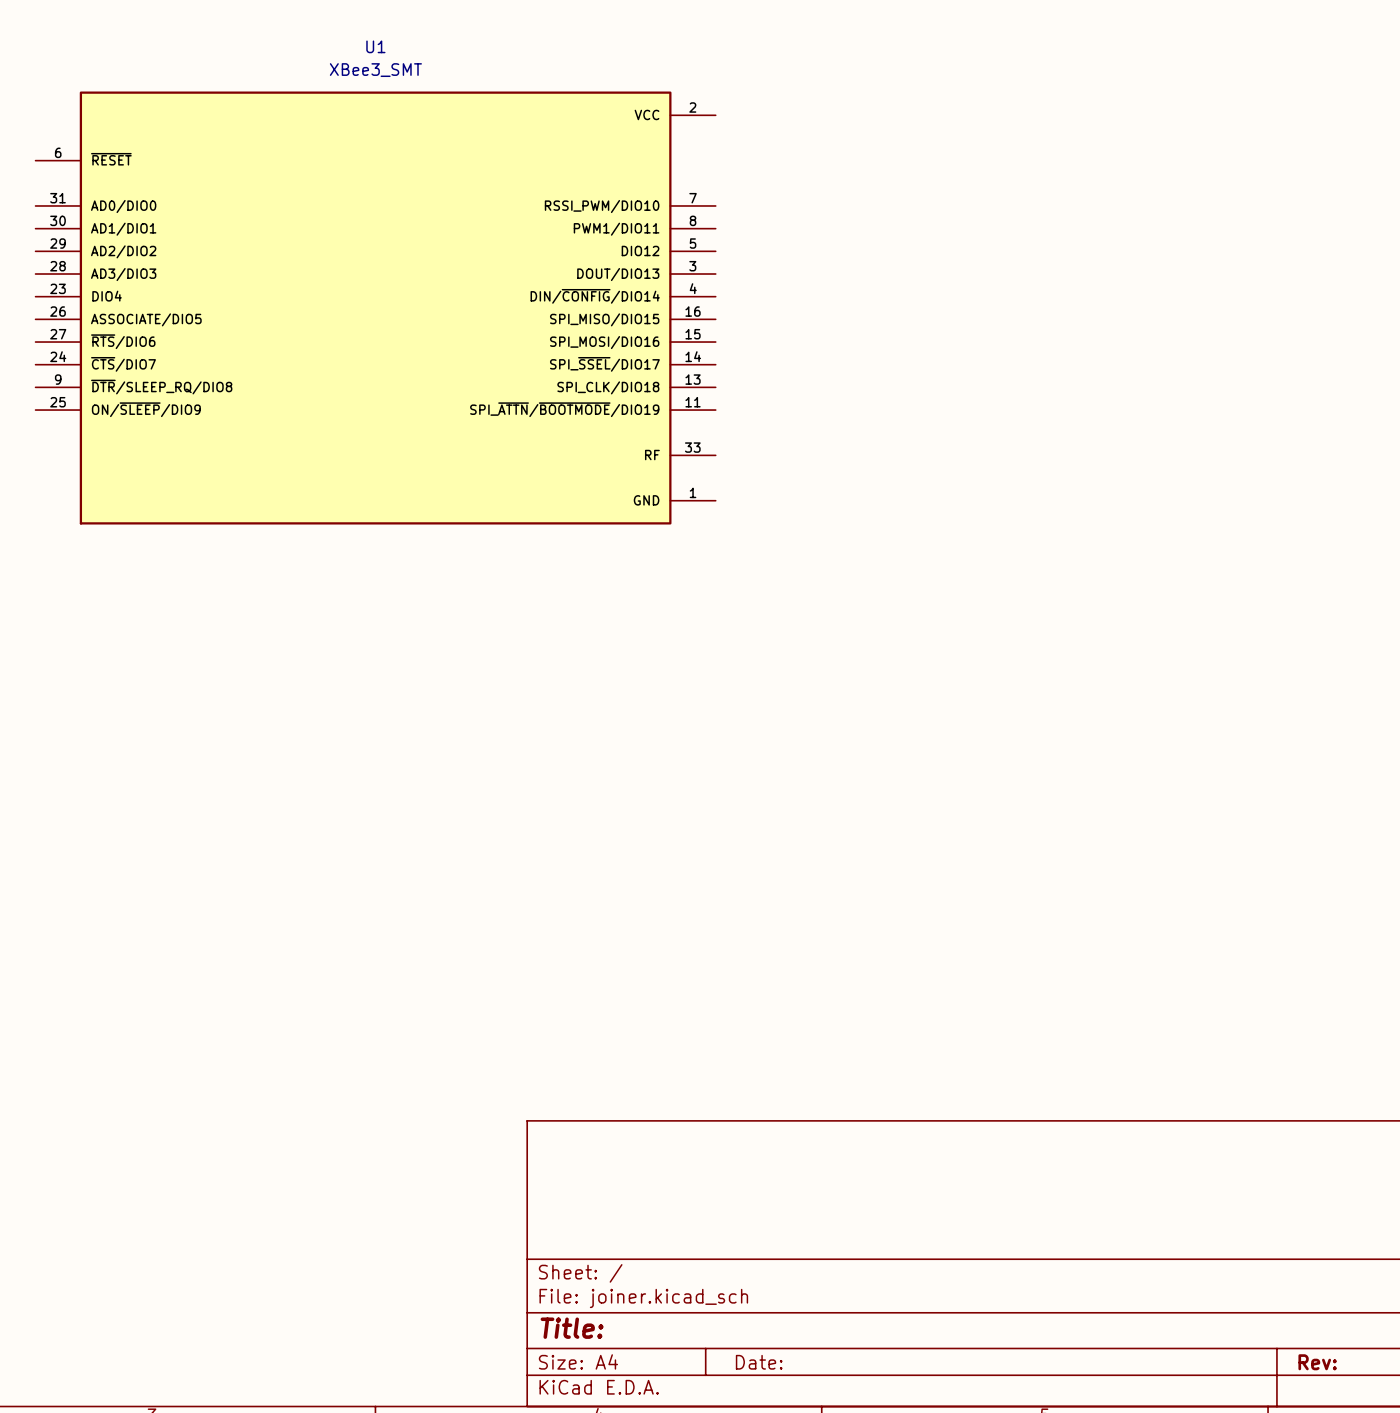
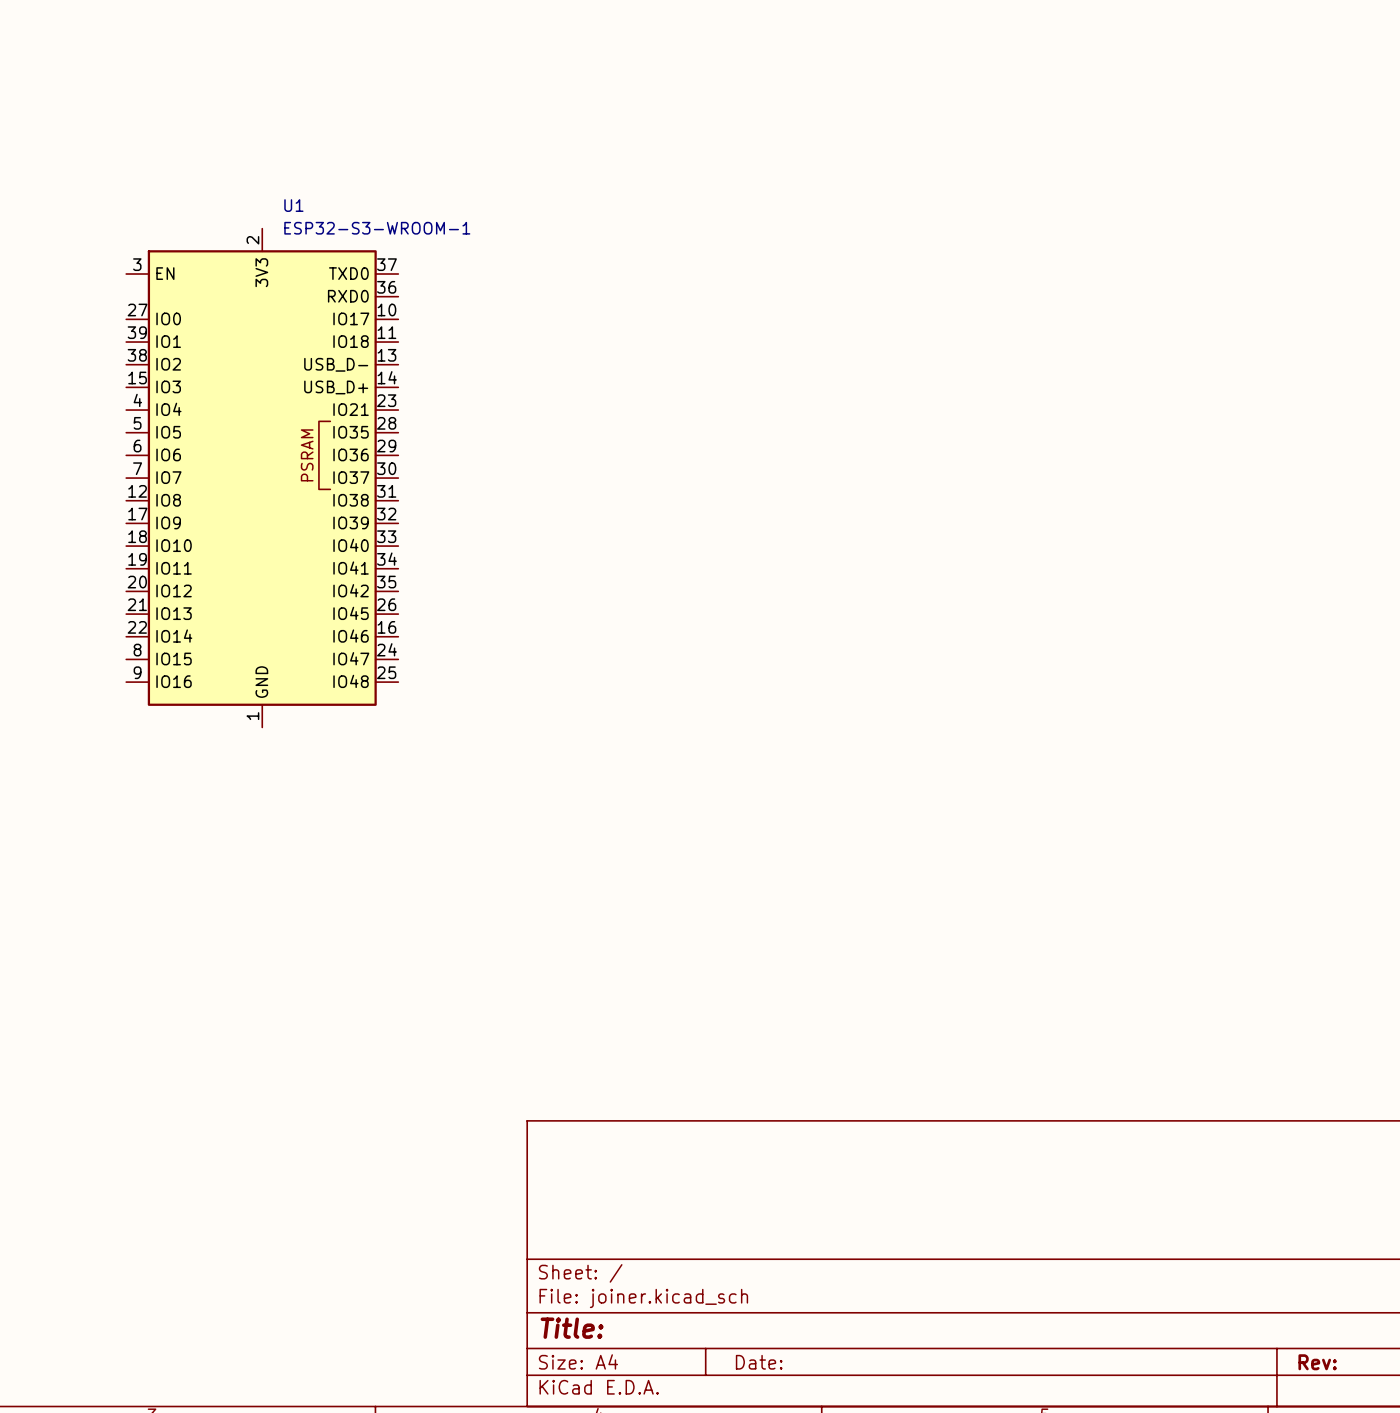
U1 name position: U1 (375, 46) -> U1 (293, 205)
U1 value: XBee3_SMT (375, 70) -> ESP32-S3-WROOM-1 (377, 228)
U1 symbol: [35, 91, 716, 525] -> [126, 228, 399, 728]

